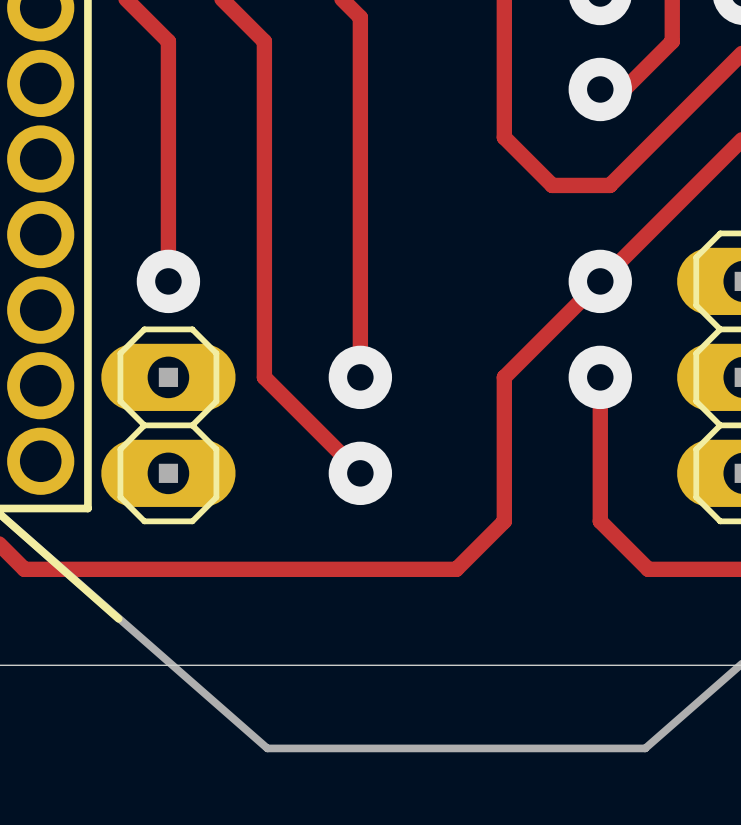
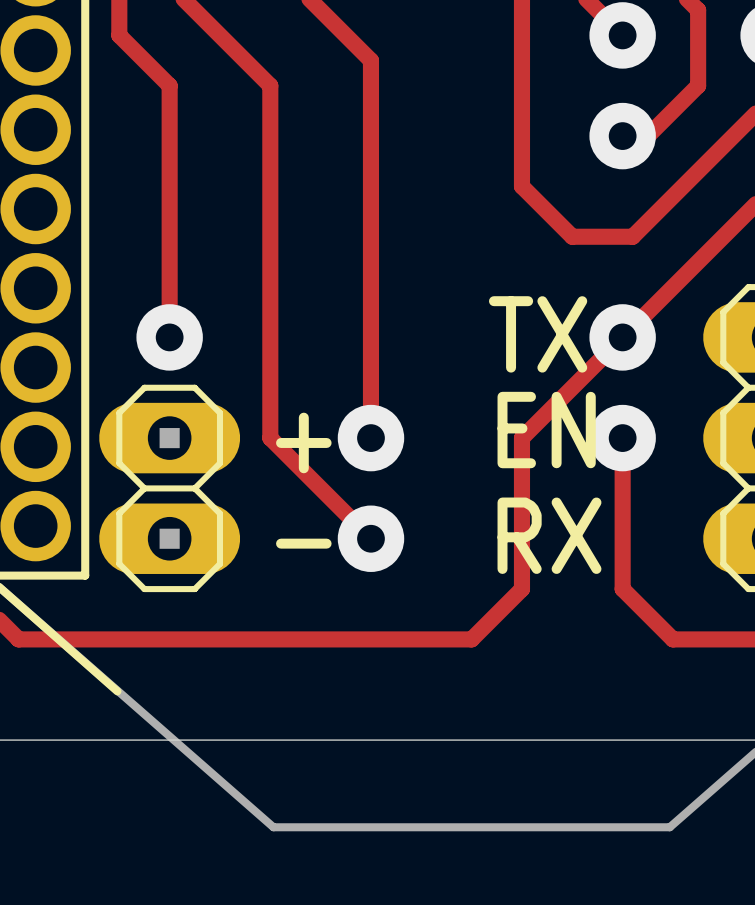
text: none -> TX (538, 334)
text: none -> EN (546, 430)
text: none -> + (303, 442)
text: none -> RX (549, 535)
text: none -> - (303, 543)

